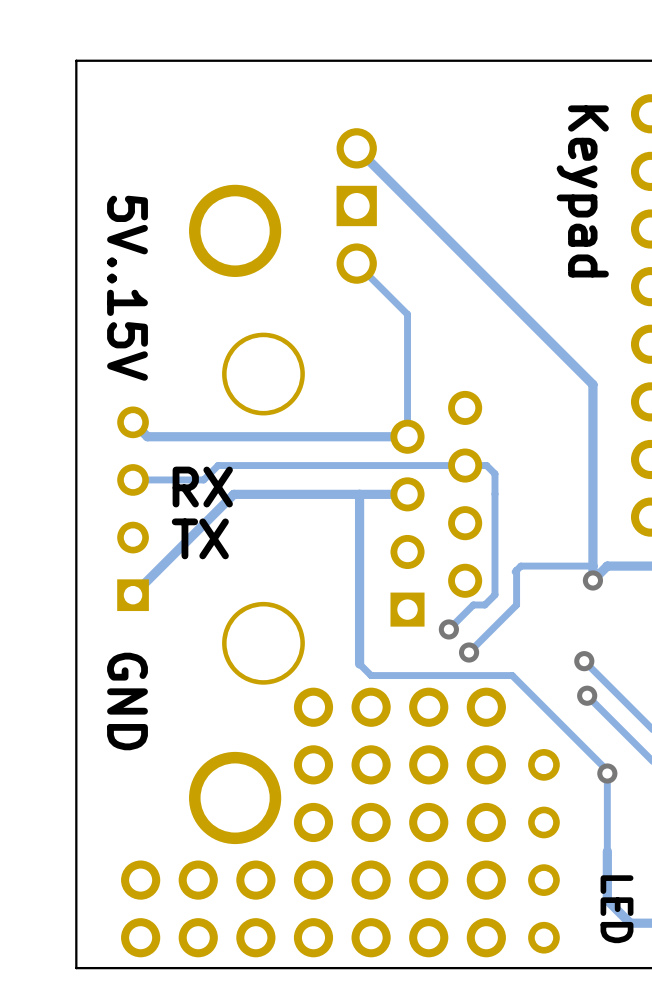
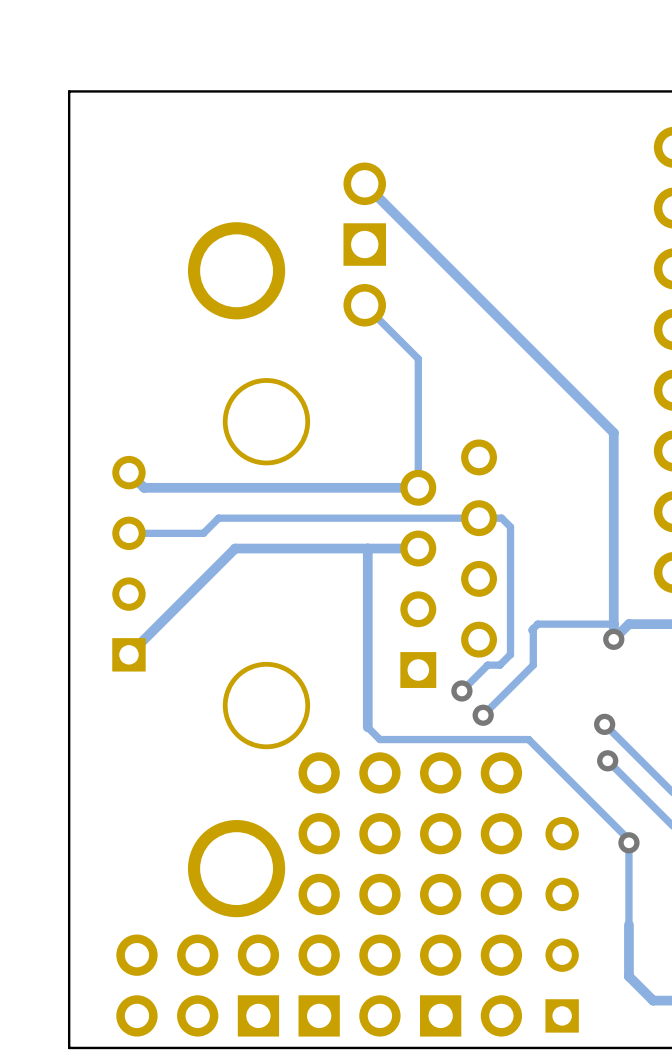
text: Keypad (582, 191) -> none
text: 5V..15V (127, 288) -> none
text: RX (202, 487) -> none
text: TX (200, 538) -> none
part footprint: [293, 687, 391, 958] -> [298, 752, 401, 1037]
part footprint: [409, 687, 506, 958] -> [420, 752, 523, 1037]
text: GND (127, 701) -> none
part footprint: [528, 749, 560, 954] -> [545, 816, 579, 1033]
part footprint: [121, 860, 276, 958] -> [116, 934, 280, 1037]
text: LED (617, 909) -> none

